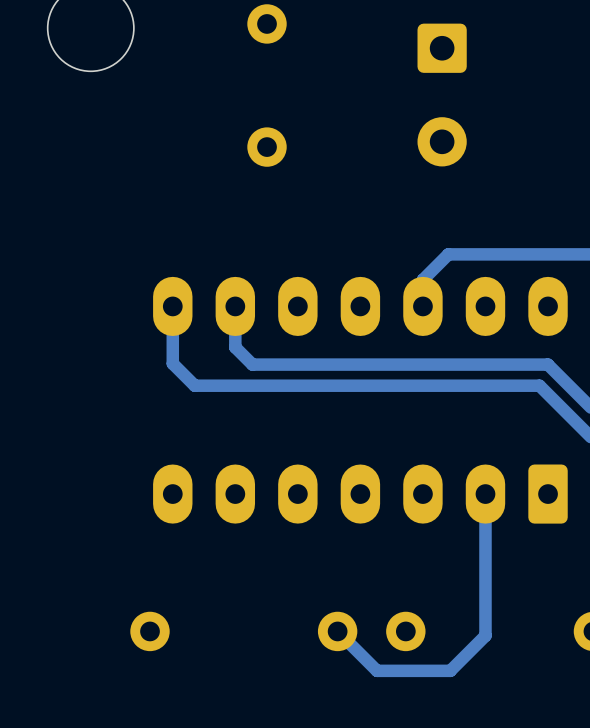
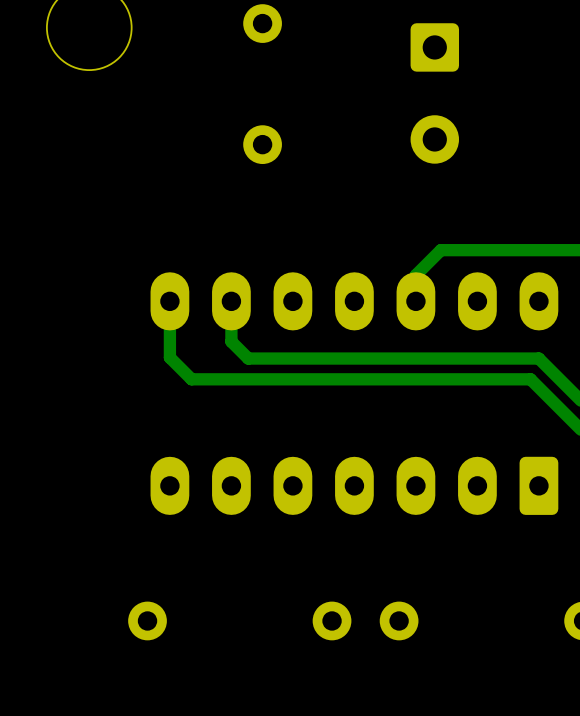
track: (485, 494) (485, 635) (450, 670) (377, 670) (337, 631) -> none

